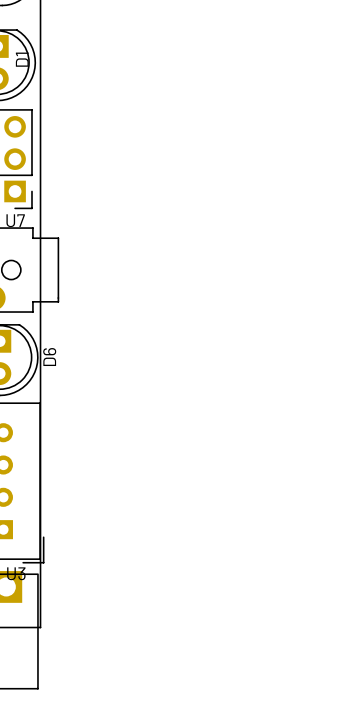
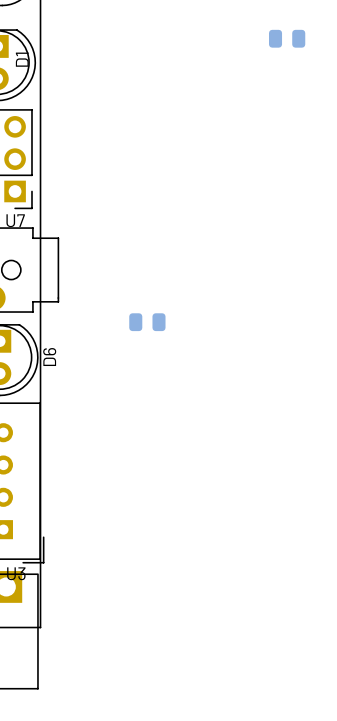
part: none -> (287, 38)
part: none -> (147, 322)

